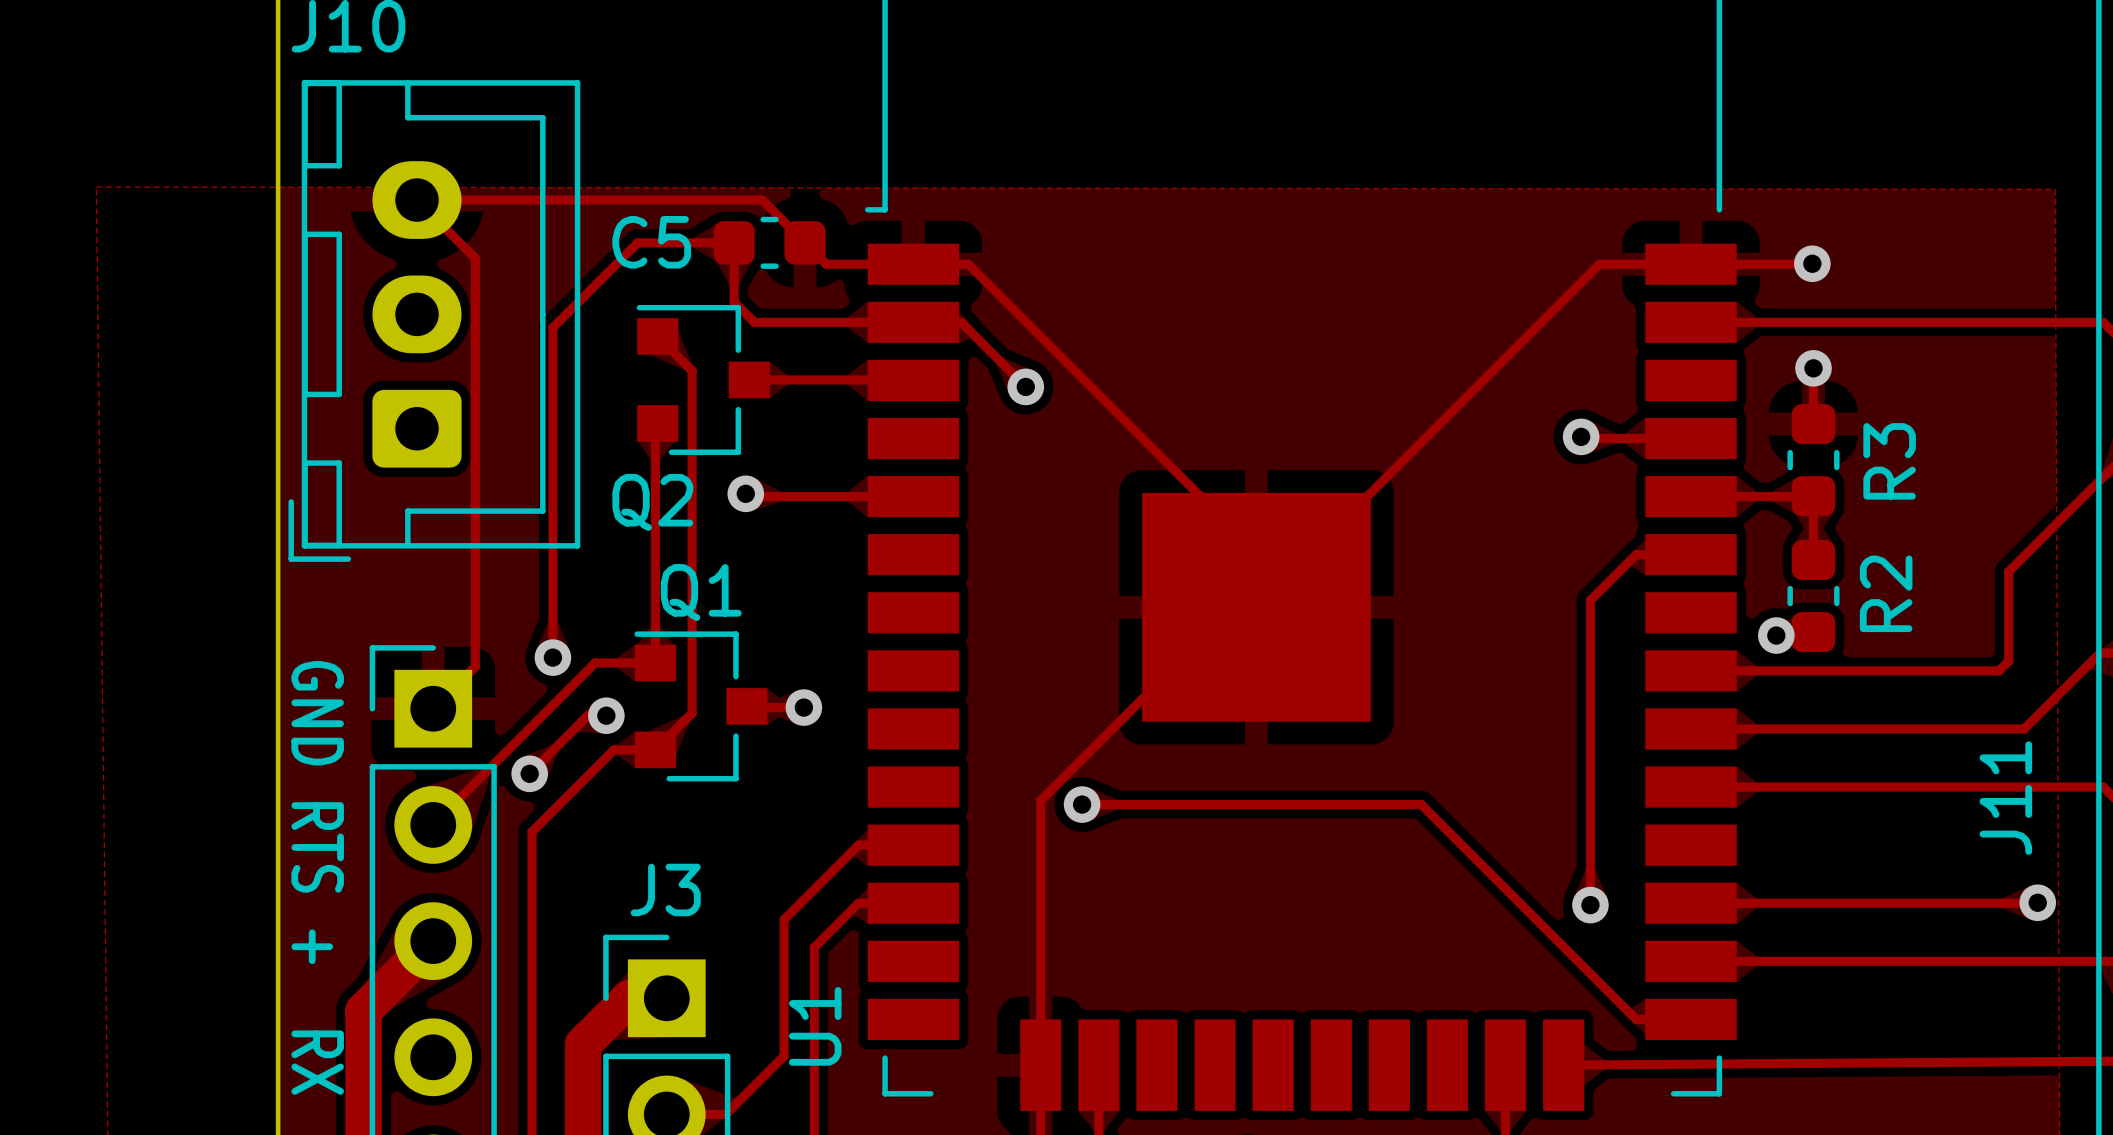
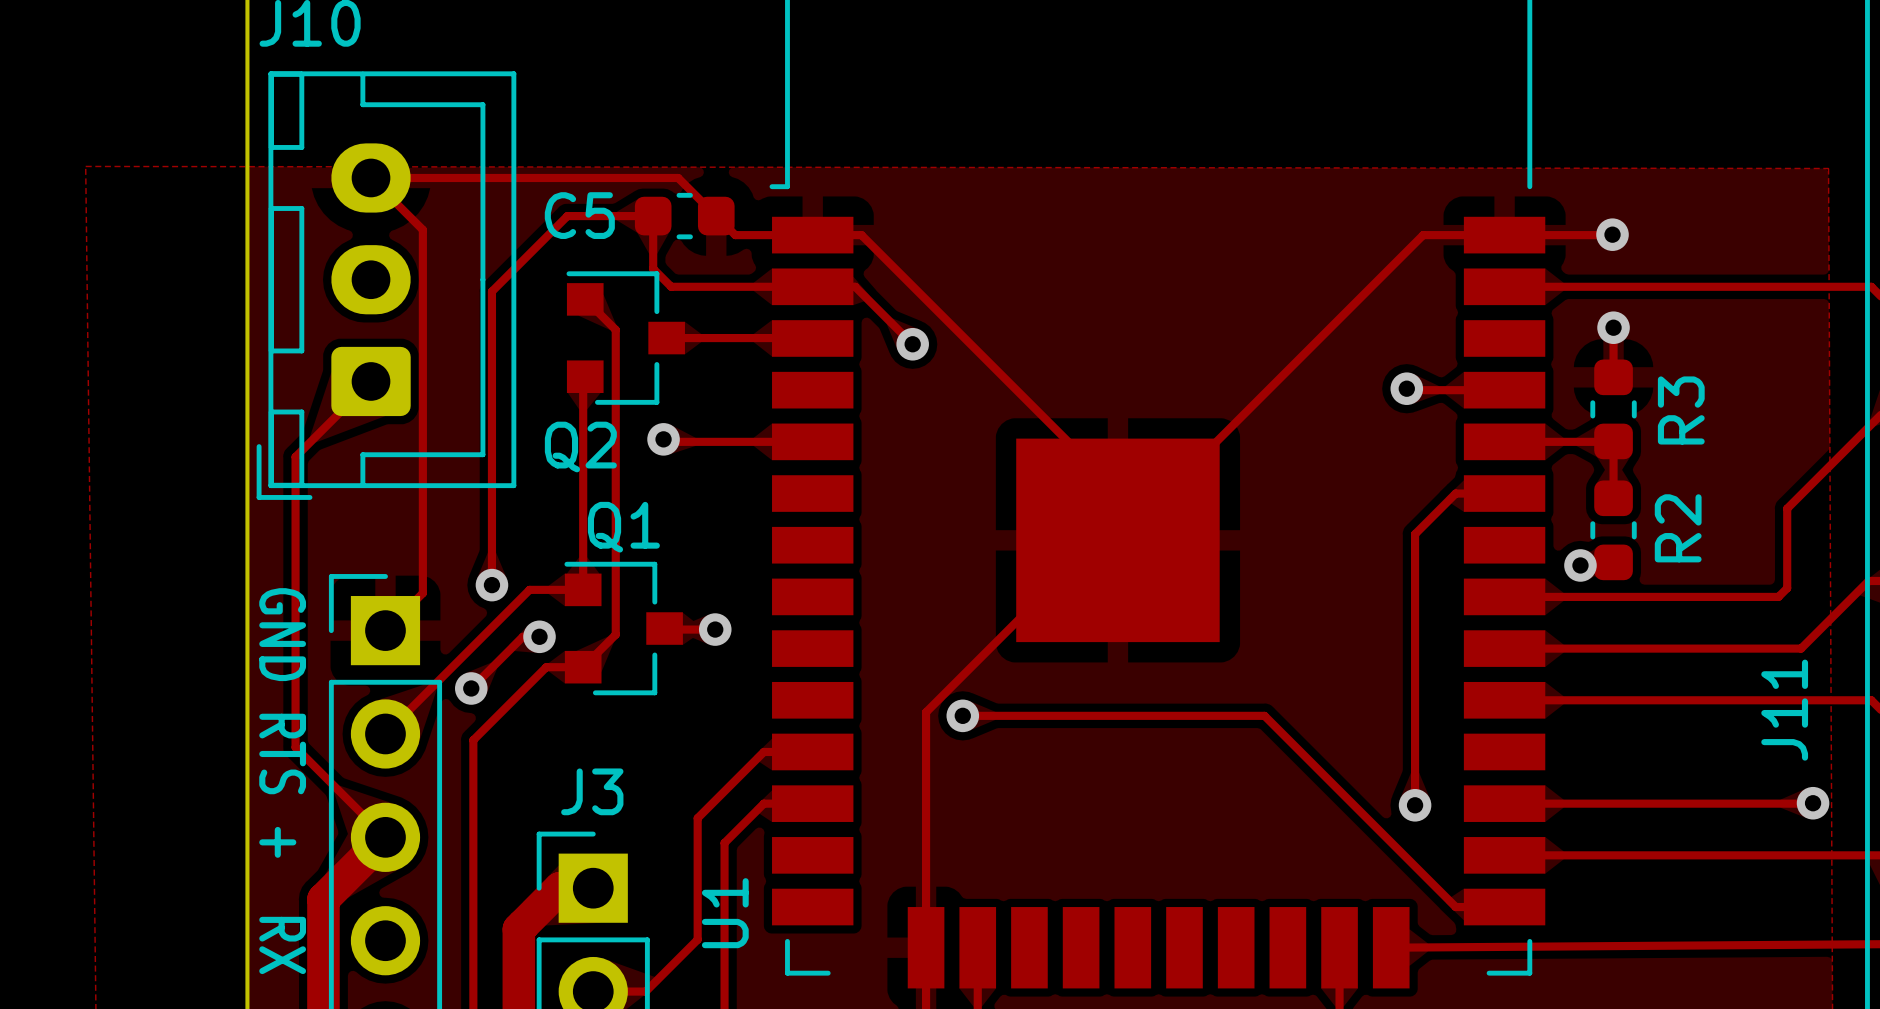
track: none -> (371, 381) (295, 456) (295, 747) (385, 837)

